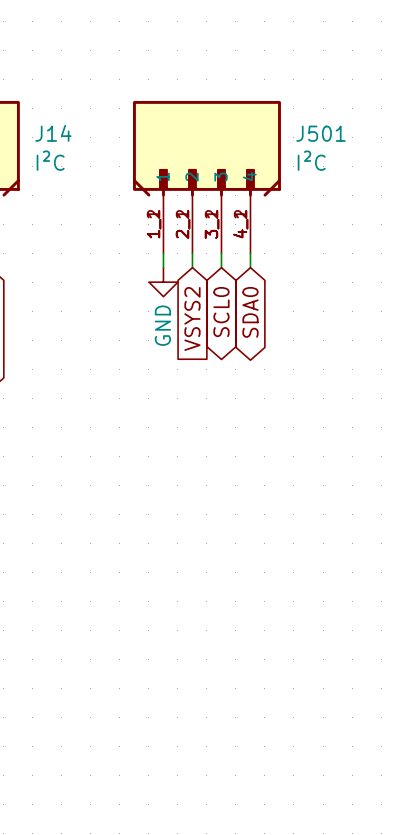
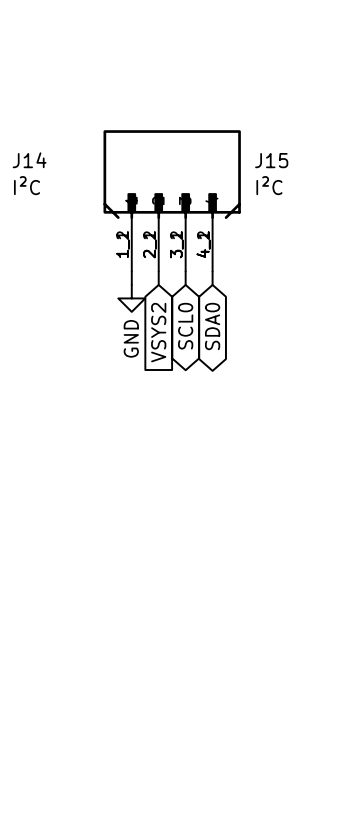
J501 name: J501 (321, 133) -> J15 (271, 160)

